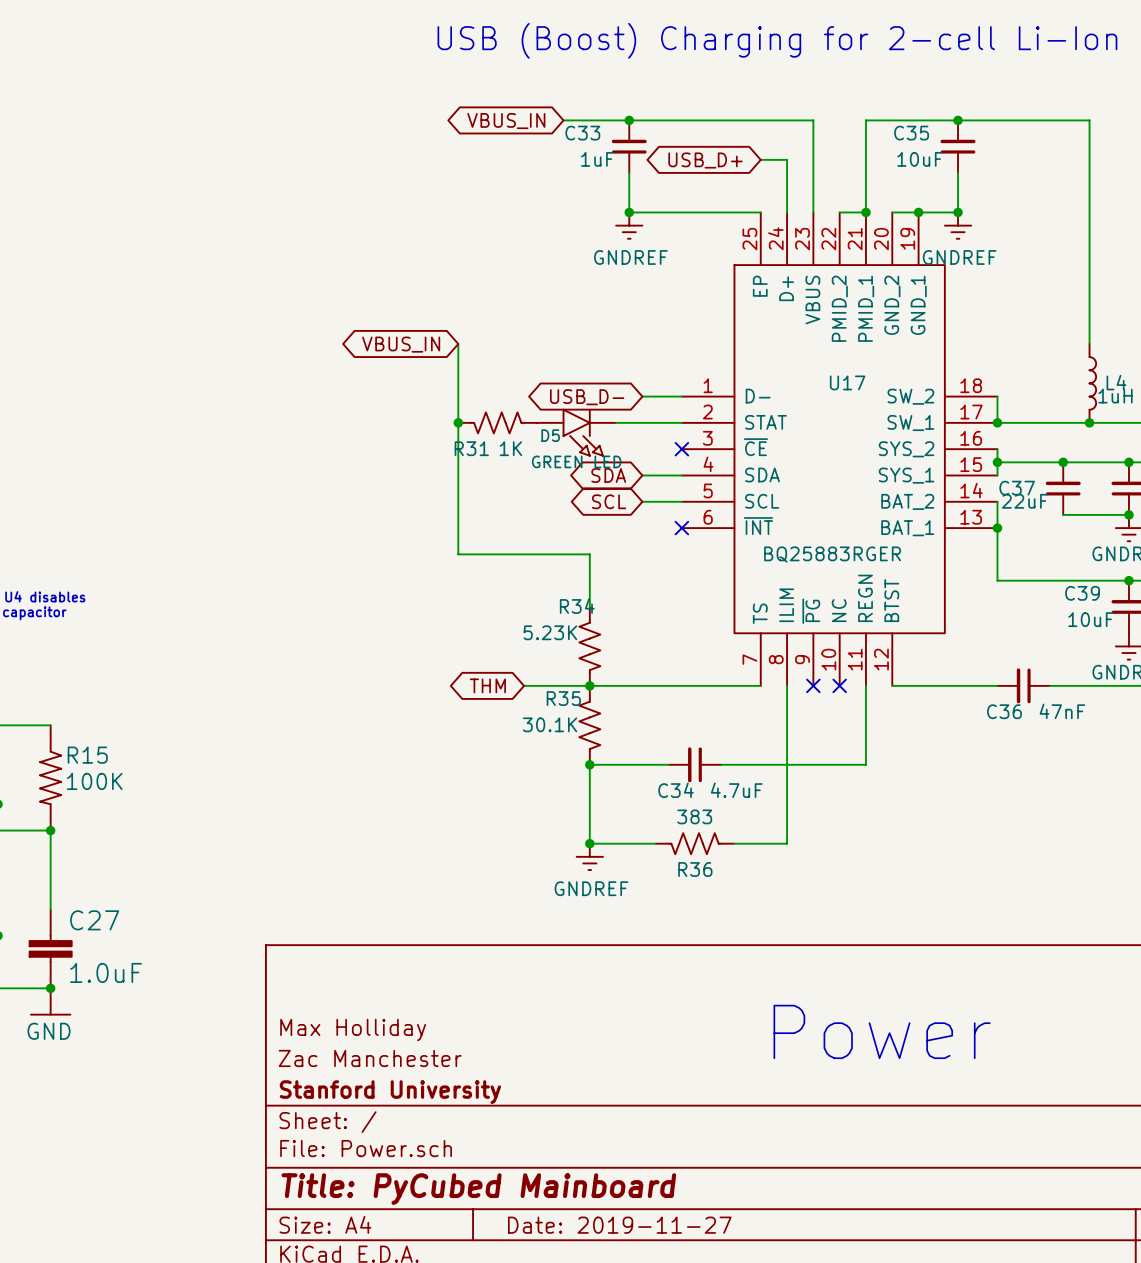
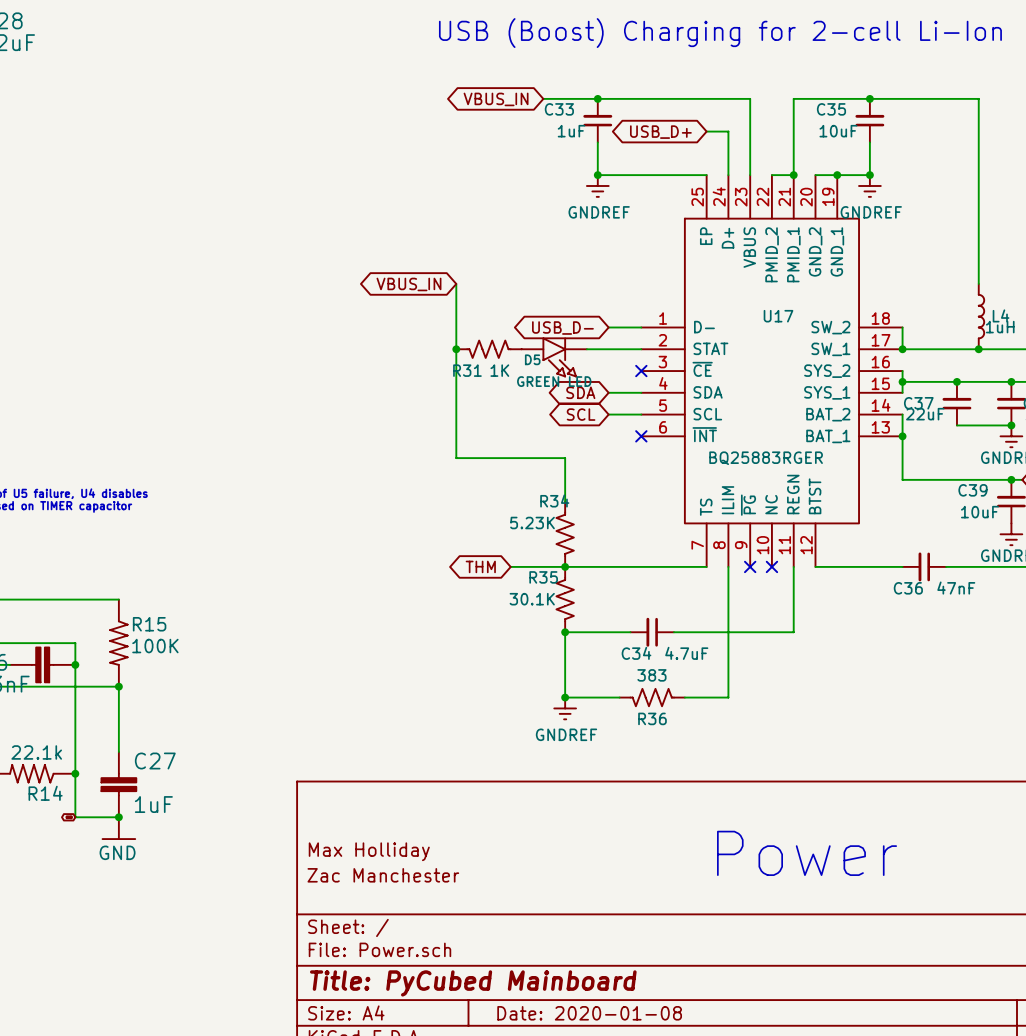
C27 value: 1.0uF (106, 972) -> 1uF (153, 804)
title block: Stanford University (390, 1092) -> none
title block: Date: 2019-11-27 (619, 1225) -> Date: 2020-01-08 (589, 1013)

